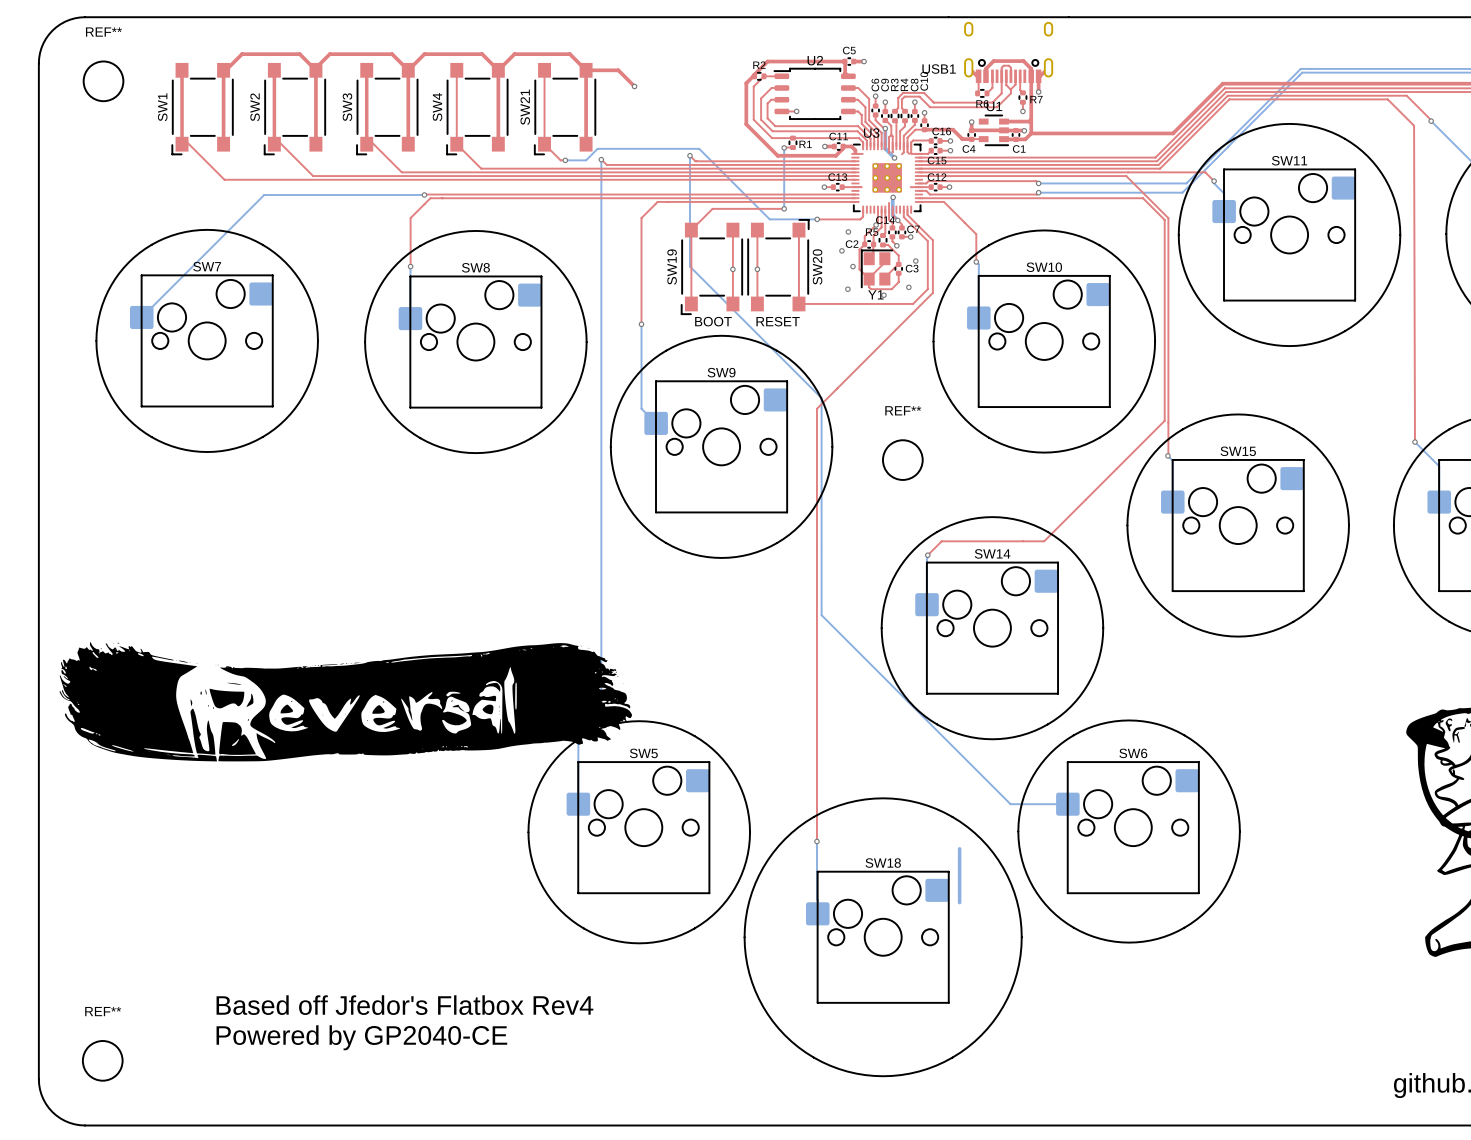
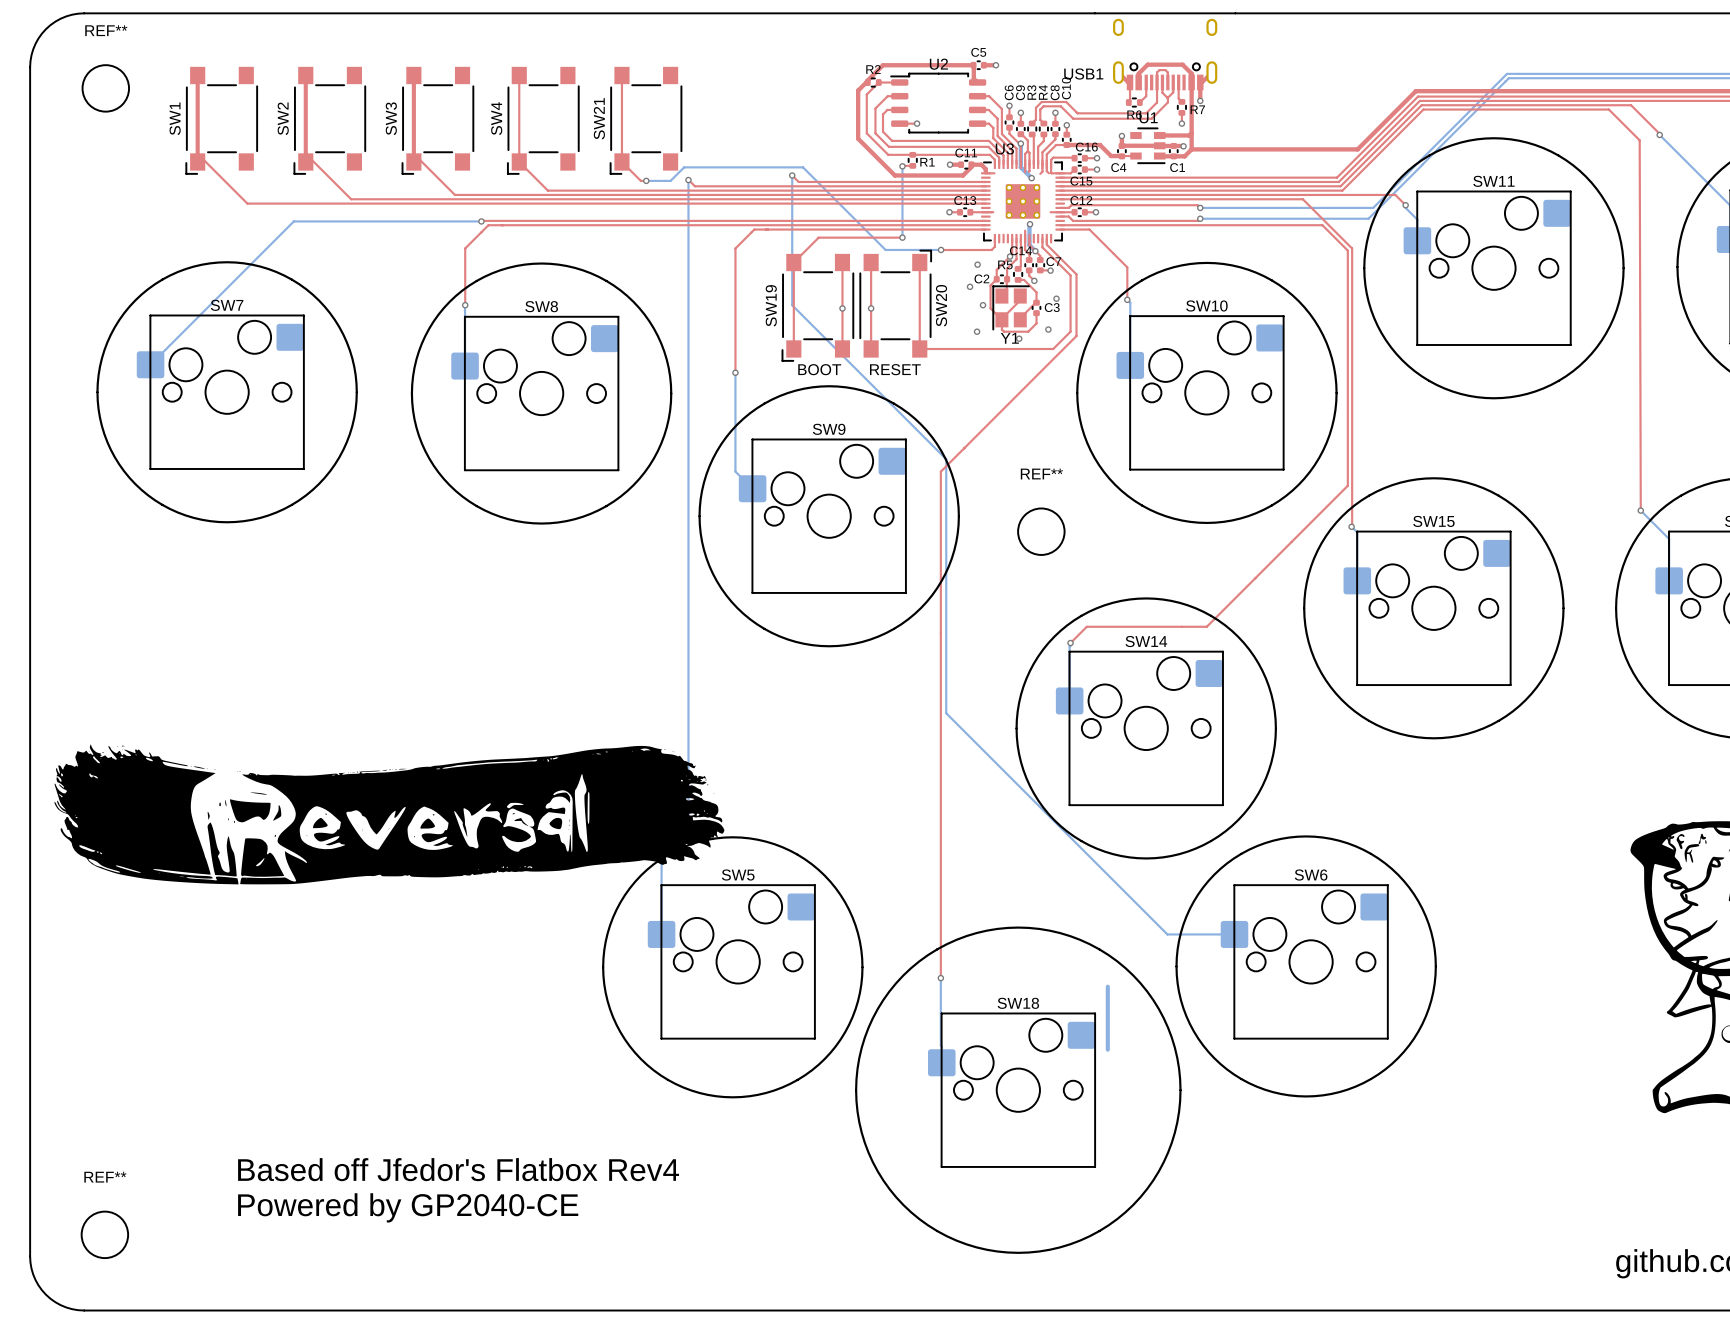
top track: (315, 70) (299, 54) (242, 54) (225, 70) (223, 70) (223, 144) -> none
top track: (408, 70) (408, 144) -> none
top track: (408, 70) (392, 54) (329, 54) (315, 68) (315, 144) -> none
top track: (408, 70) (424, 54) (482, 54) (498, 70) -> none
top track: (498, 70) (498, 144) -> none
top track: (498, 70) (514, 54) (569, 54) (586, 70) -> none
top track: (586, 70) (618, 70) (634, 86) -> none
top track: (586, 70) (586, 144) -> none
via: (634, 86) -> none

